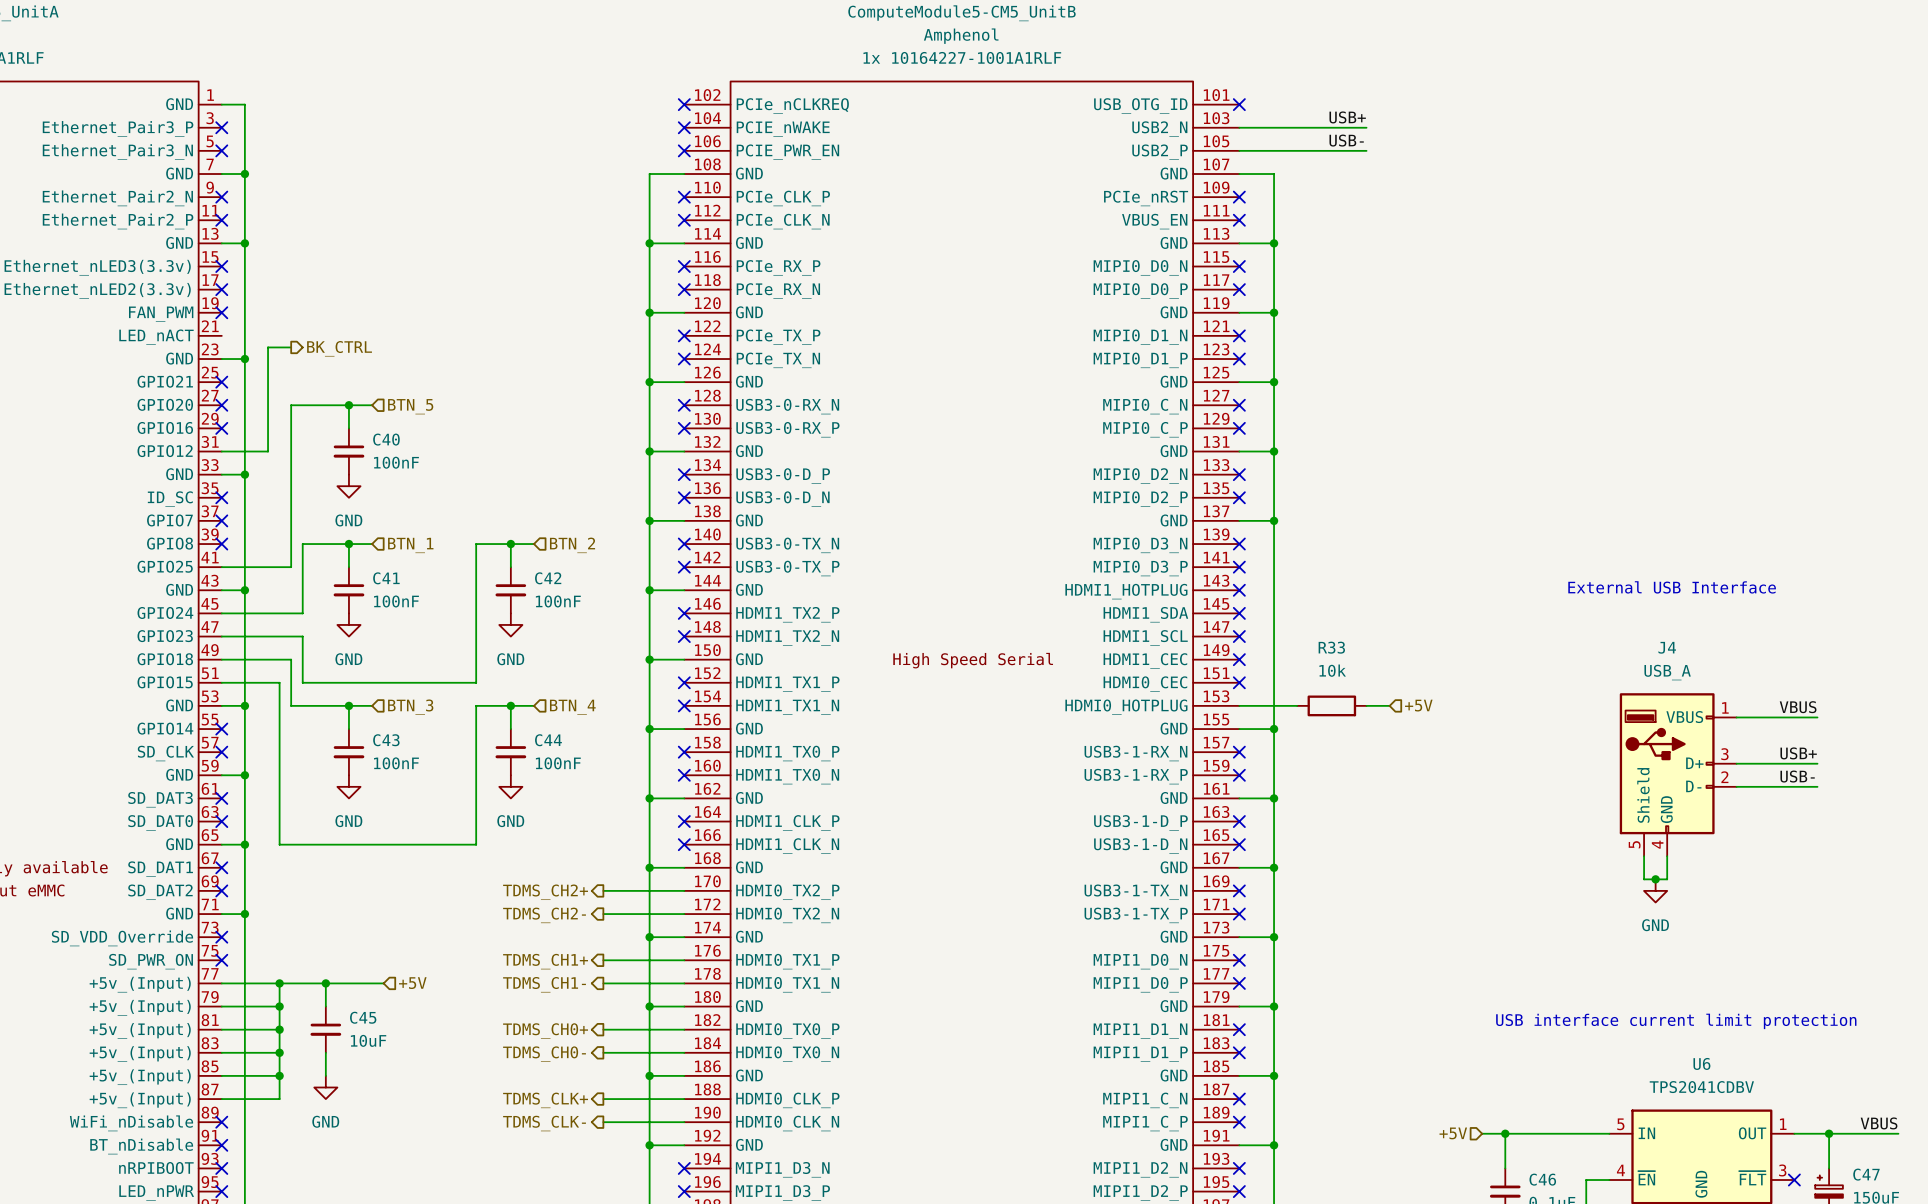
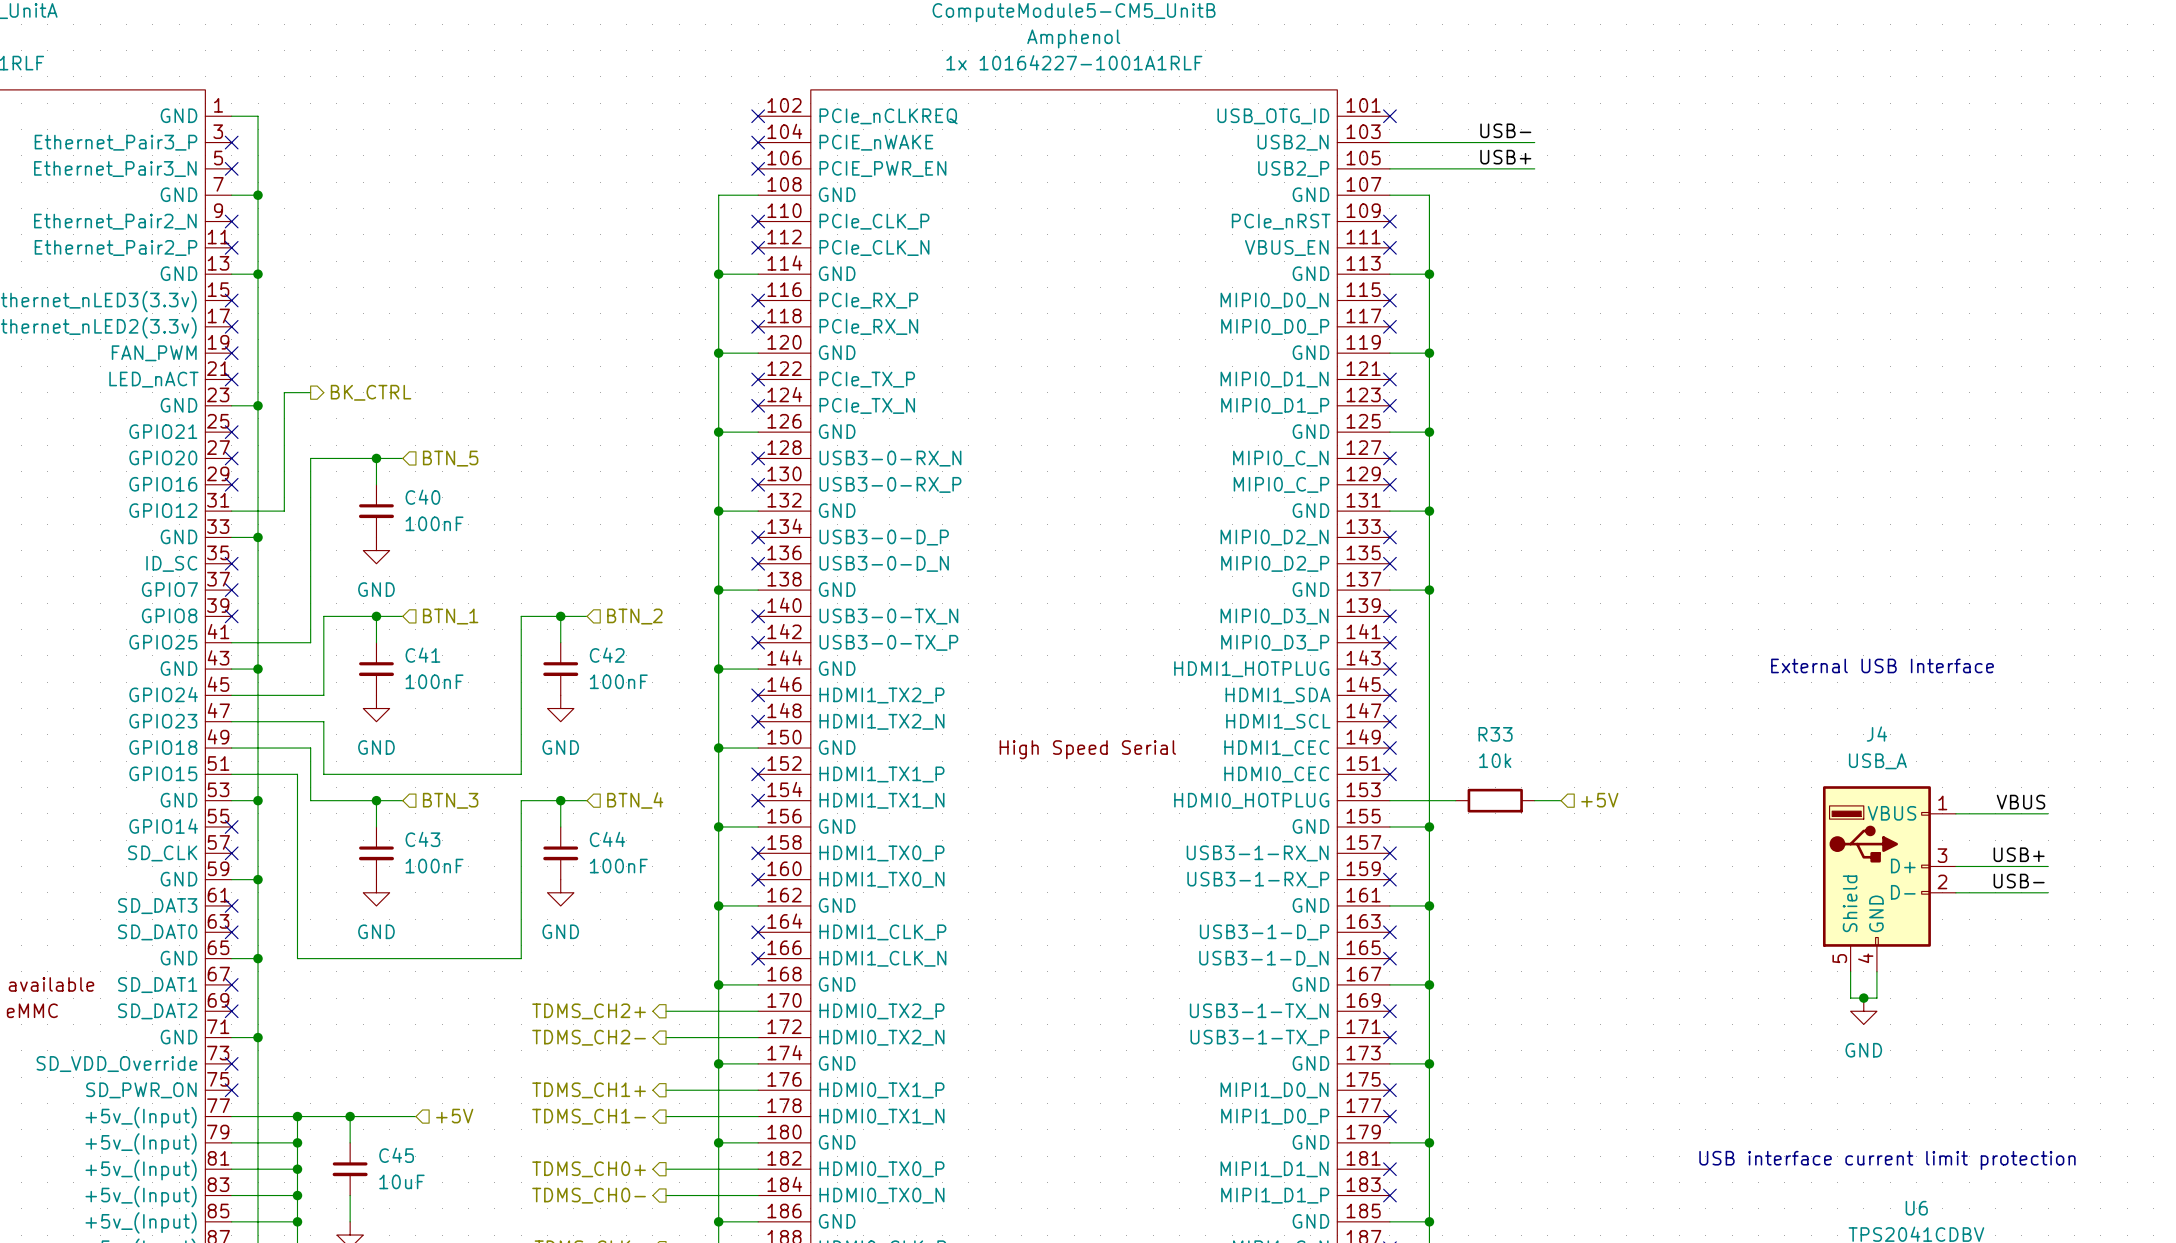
label: USB+ (1347, 117) -> USB- (1505, 130)
label: USB- (1346, 140) -> USB+ (1505, 157)
no-connect mark: none -> (231, 379)

